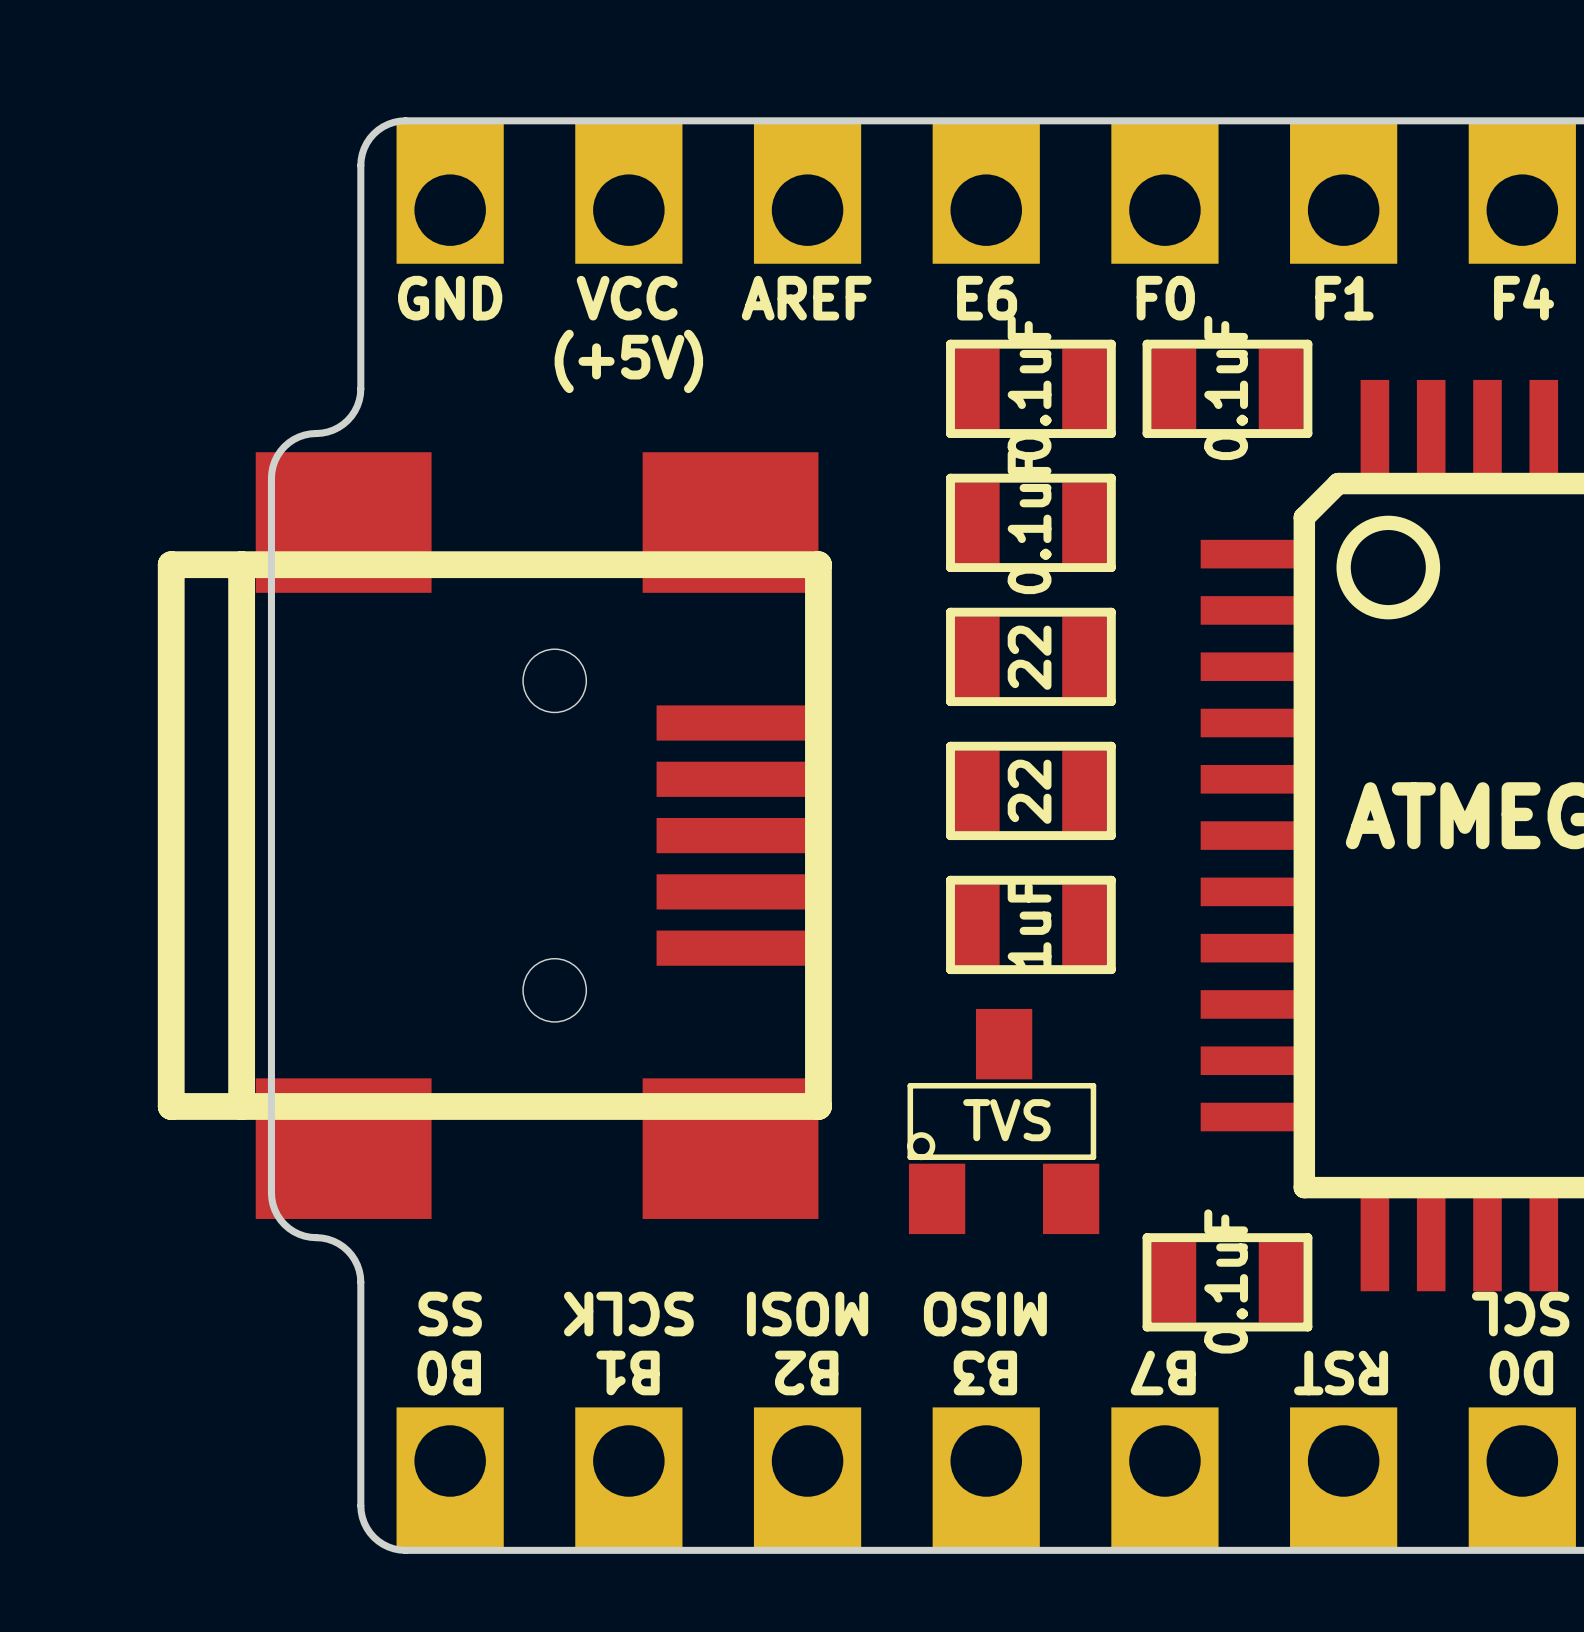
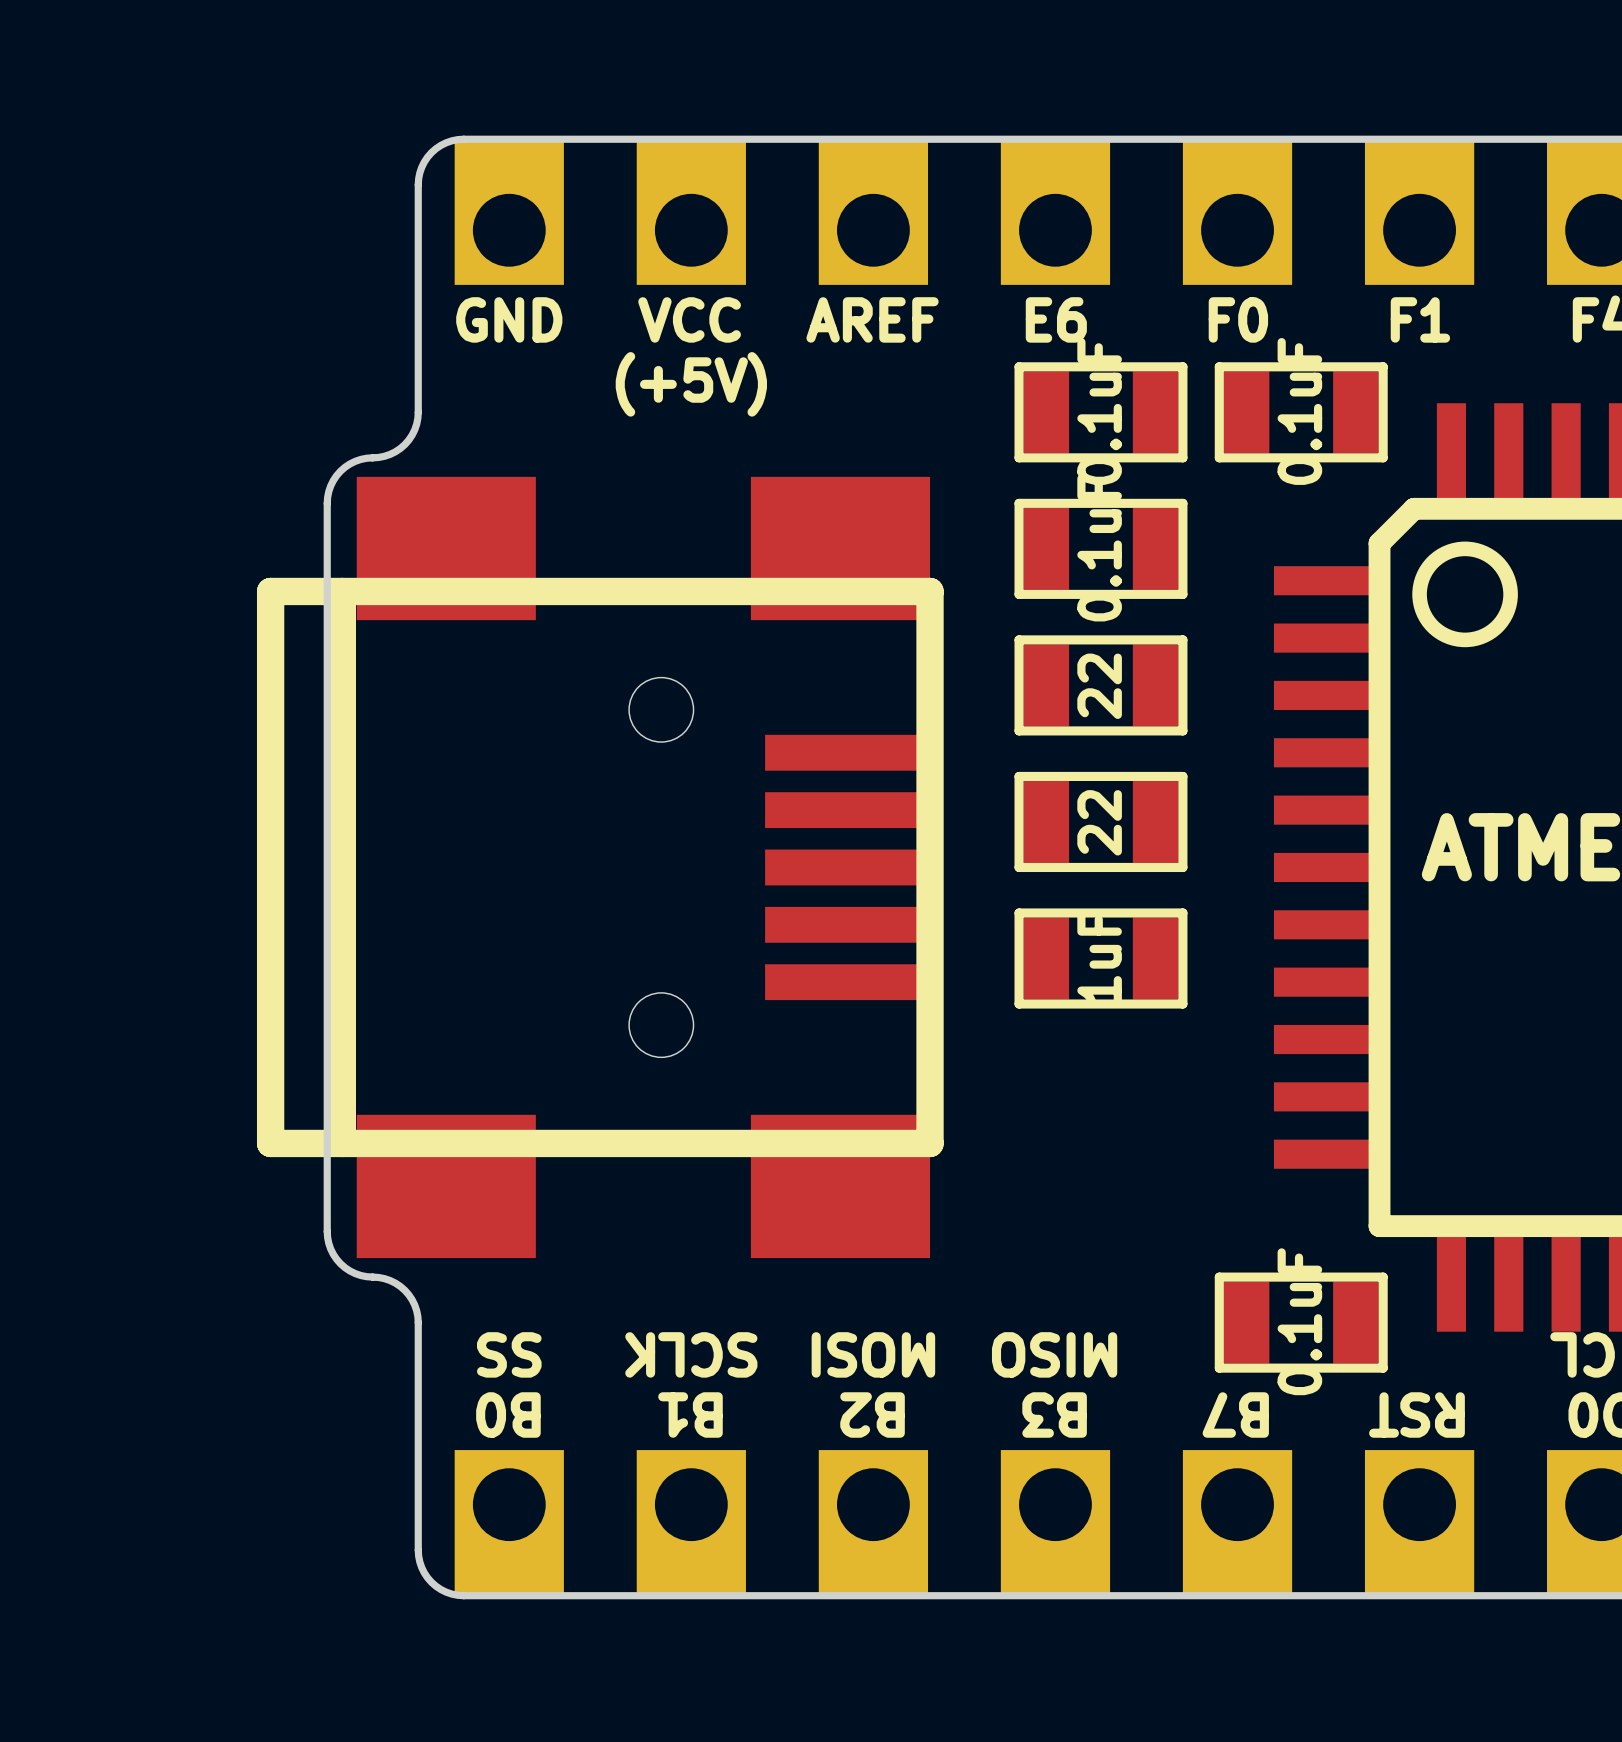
part position: (494, 835) -> (600, 867)
part: TVS (1003, 1121) -> none

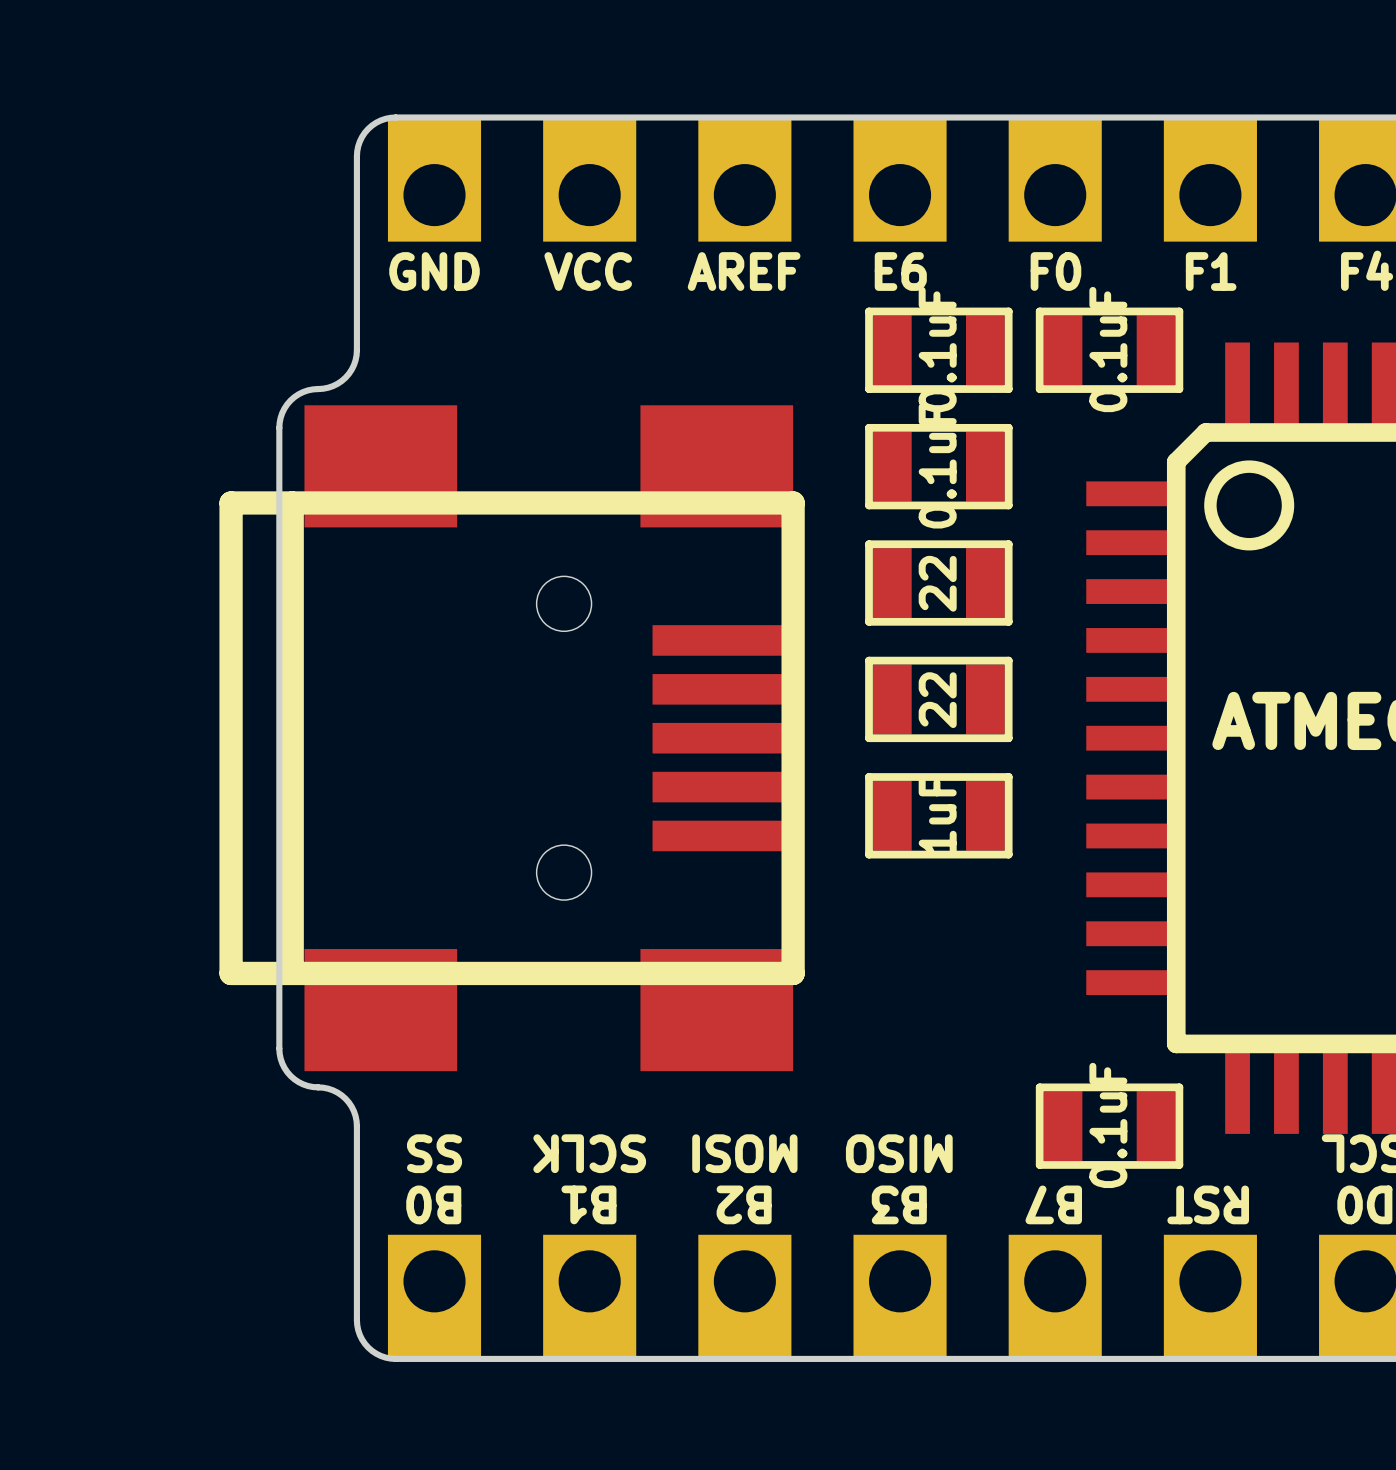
text: (+5V) (691, 384) -> none

